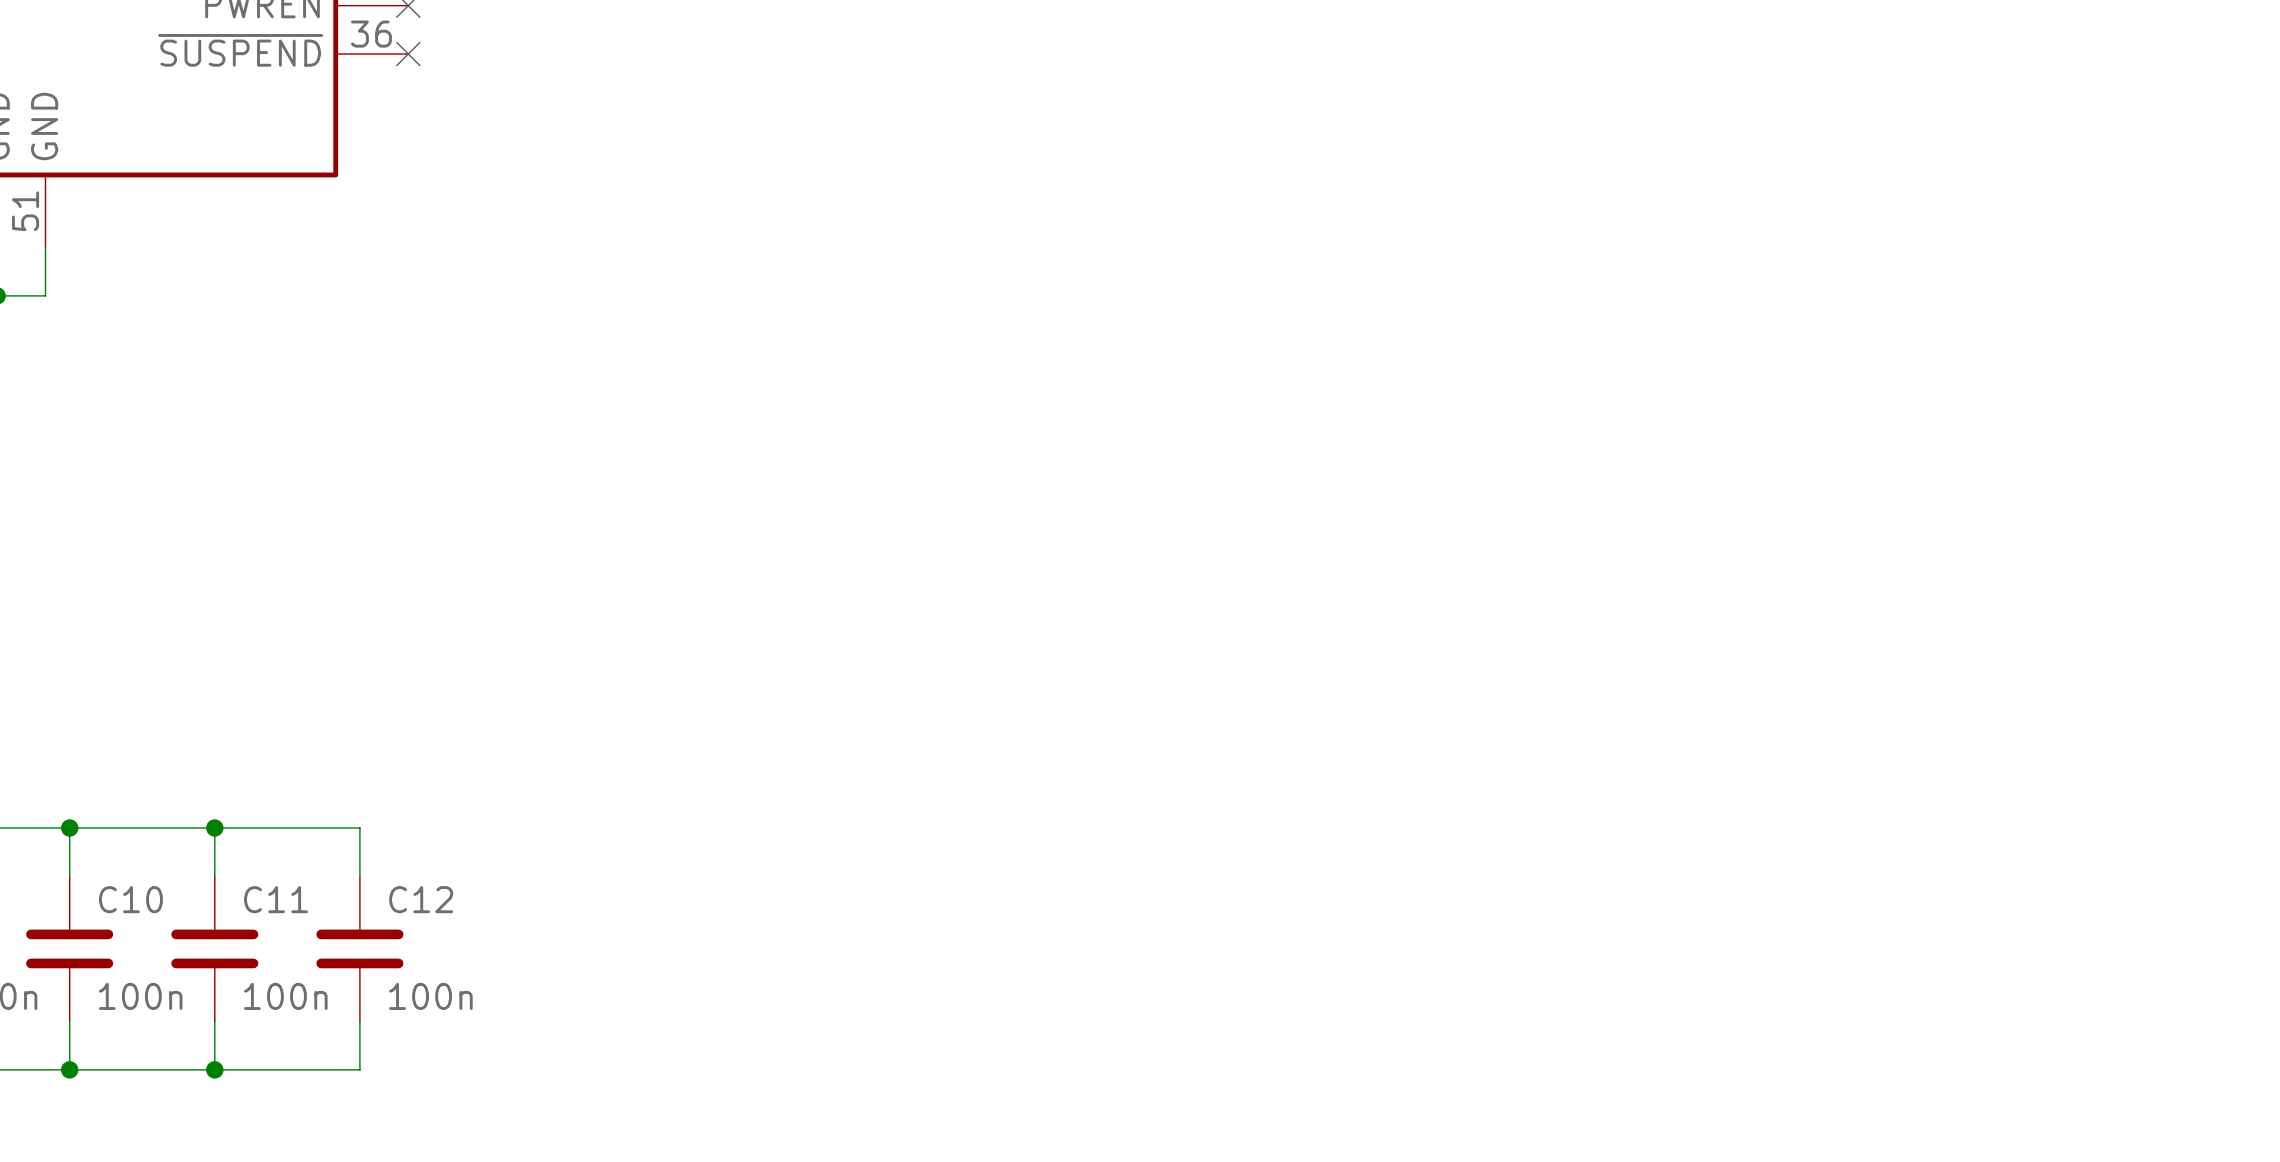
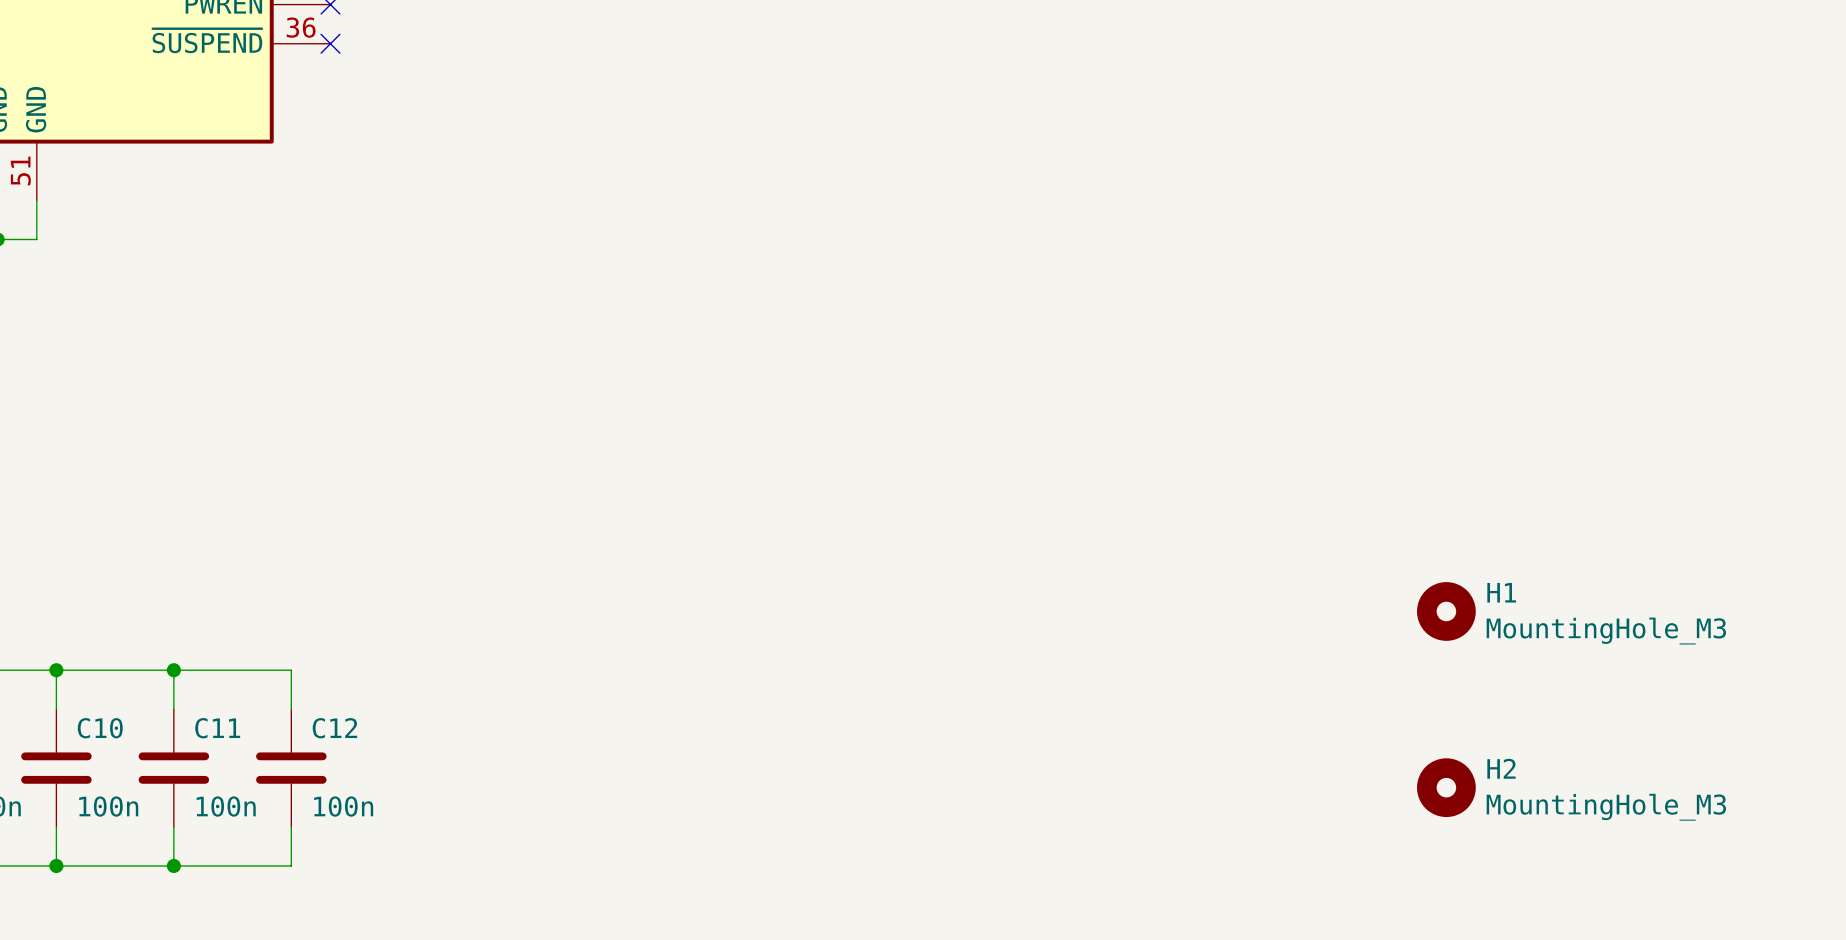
H1: none -> MountingHole_M3 (1446, 611)
H2: none -> MountingHole_M3 (1446, 787)

